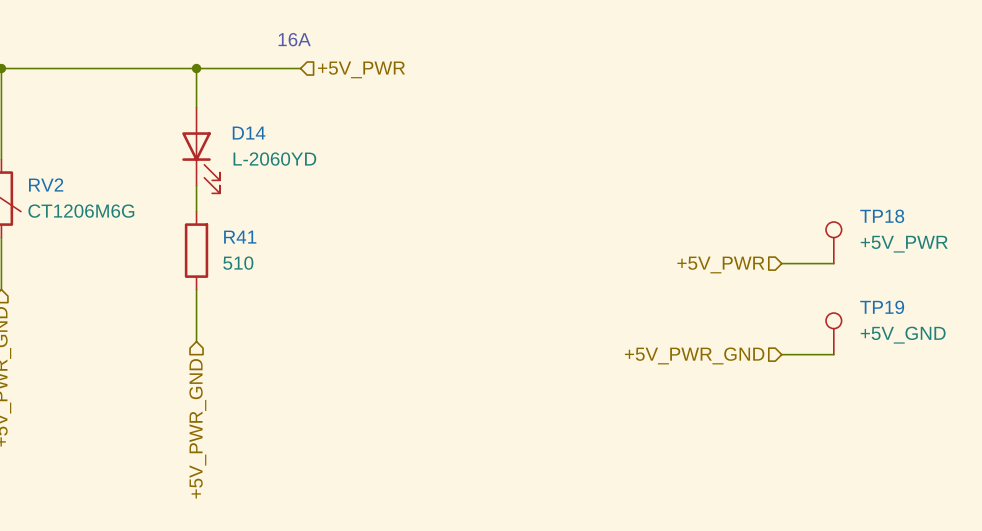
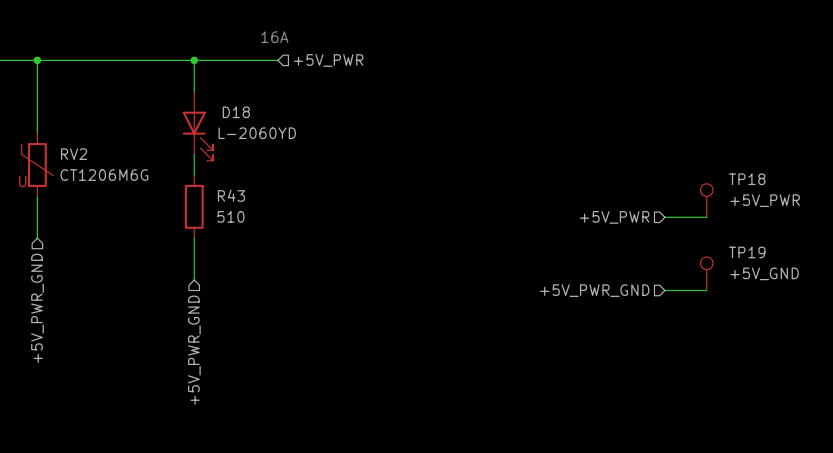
D14 name: D14 (249, 133) -> D18 (236, 112)
R41 name: R41 (240, 237) -> R43 (231, 195)

